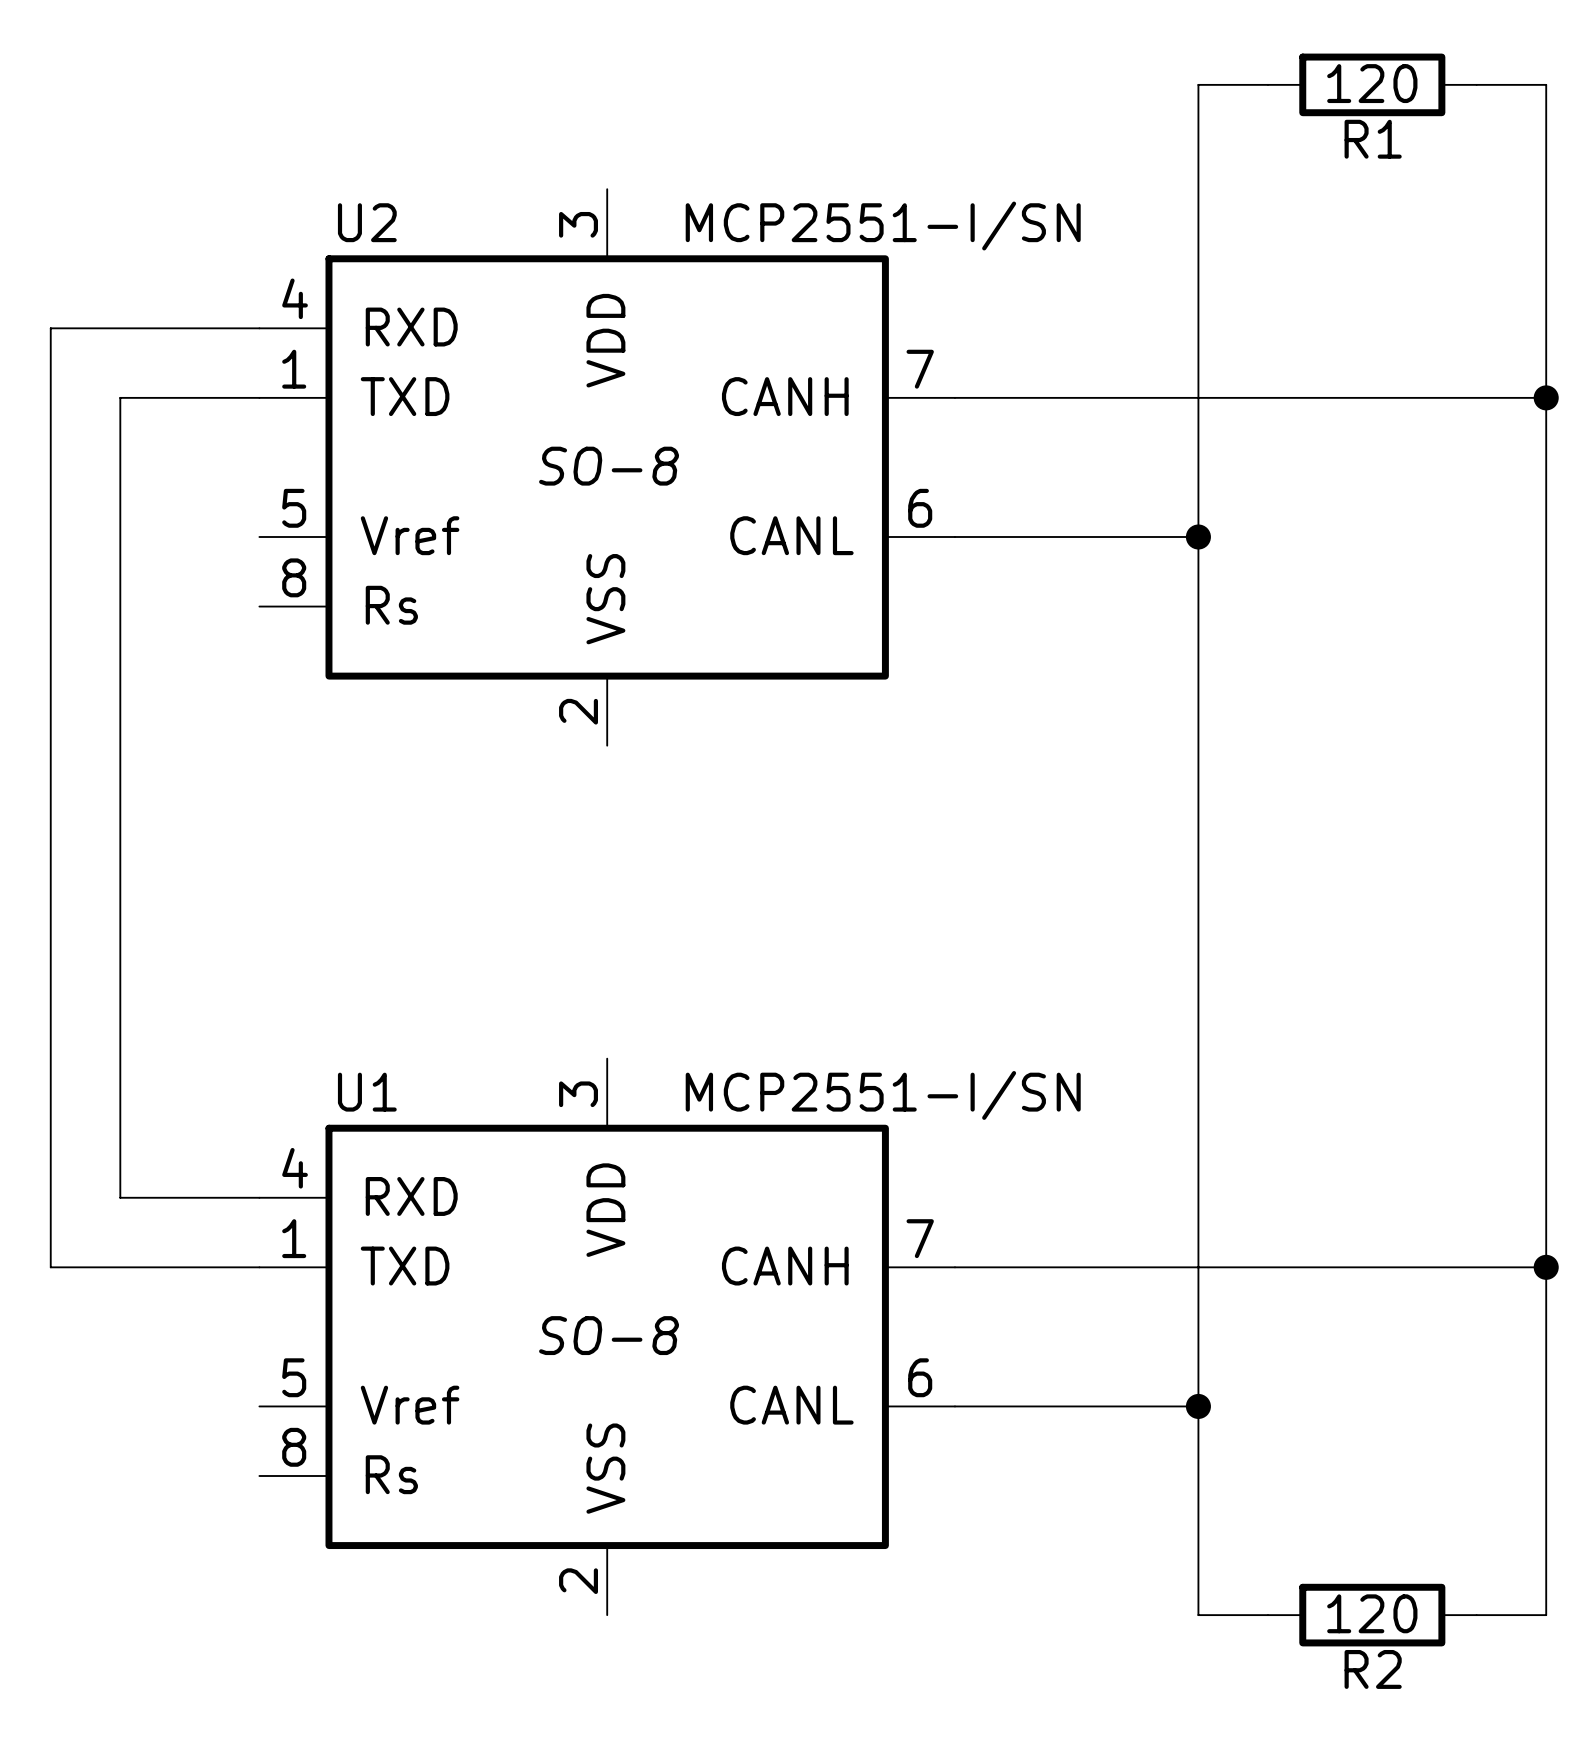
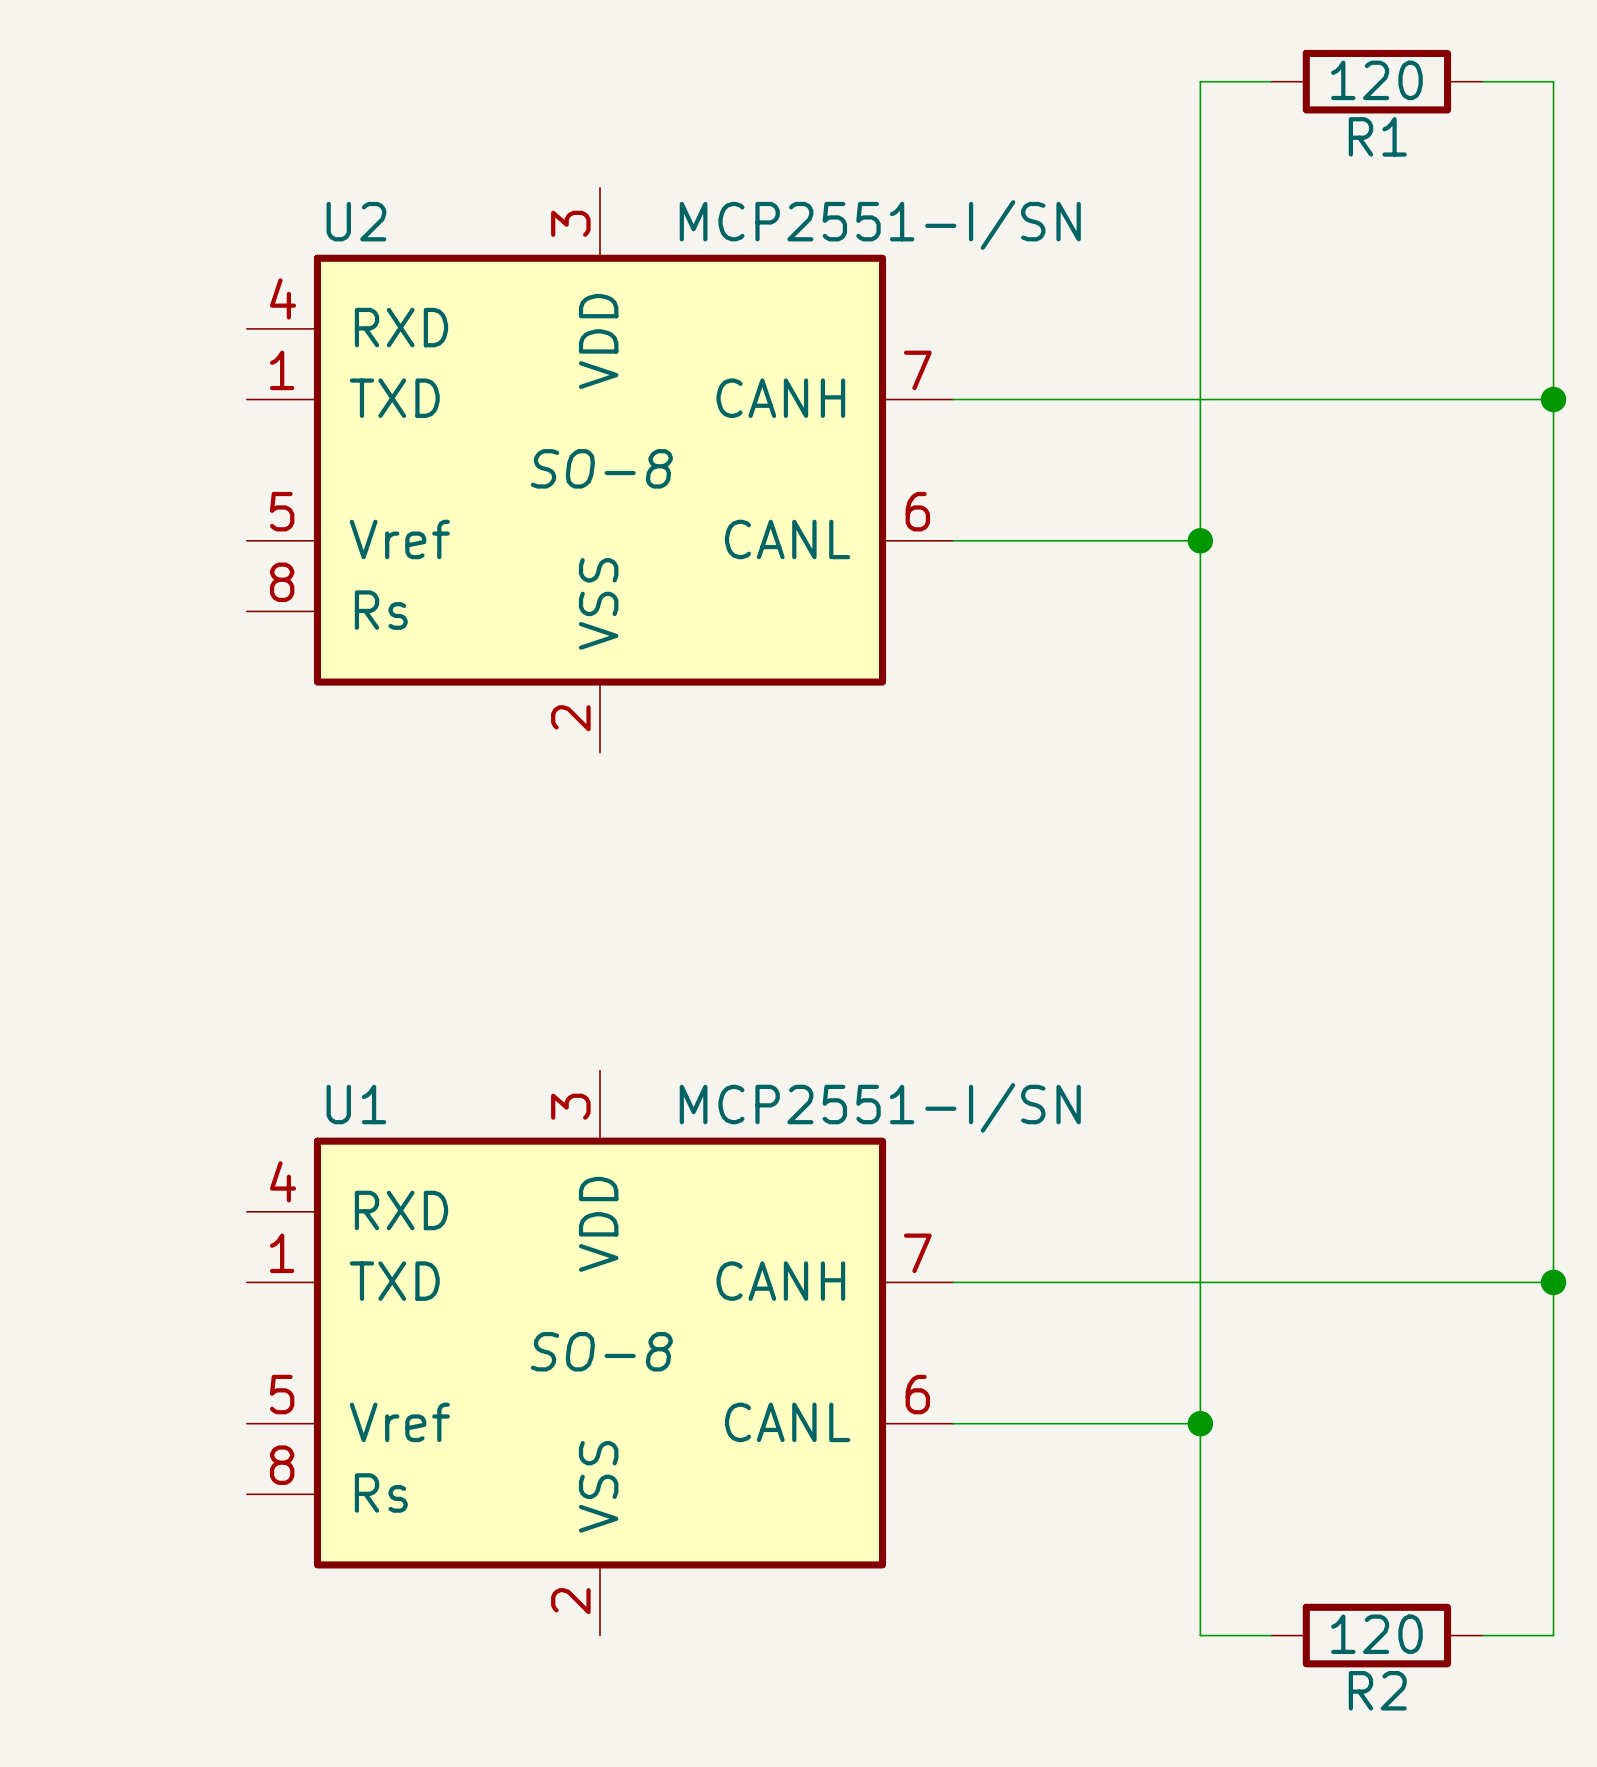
wire: (259, 328) (50, 328) (50, 1267) (259, 1267) -> none
wire: (259, 397) (120, 397) (120, 1197) (259, 1197) -> none

